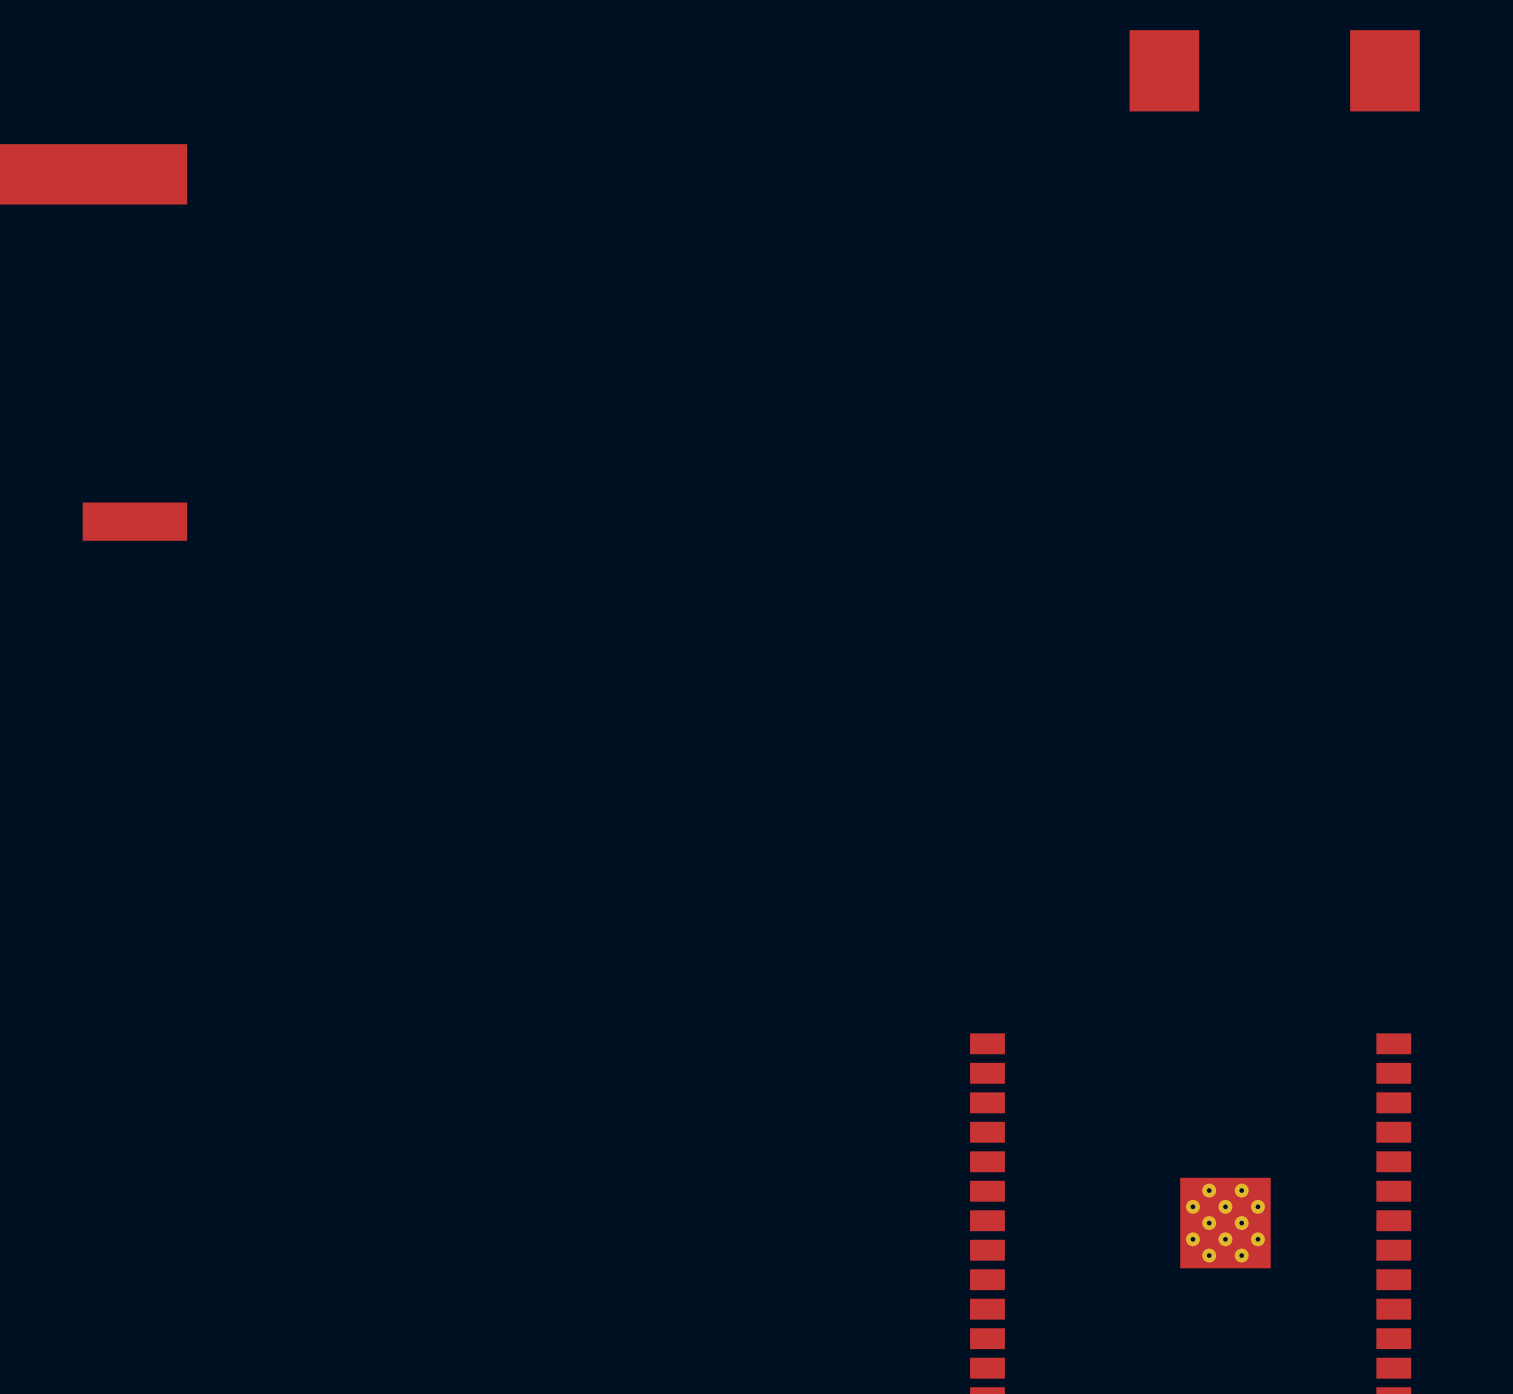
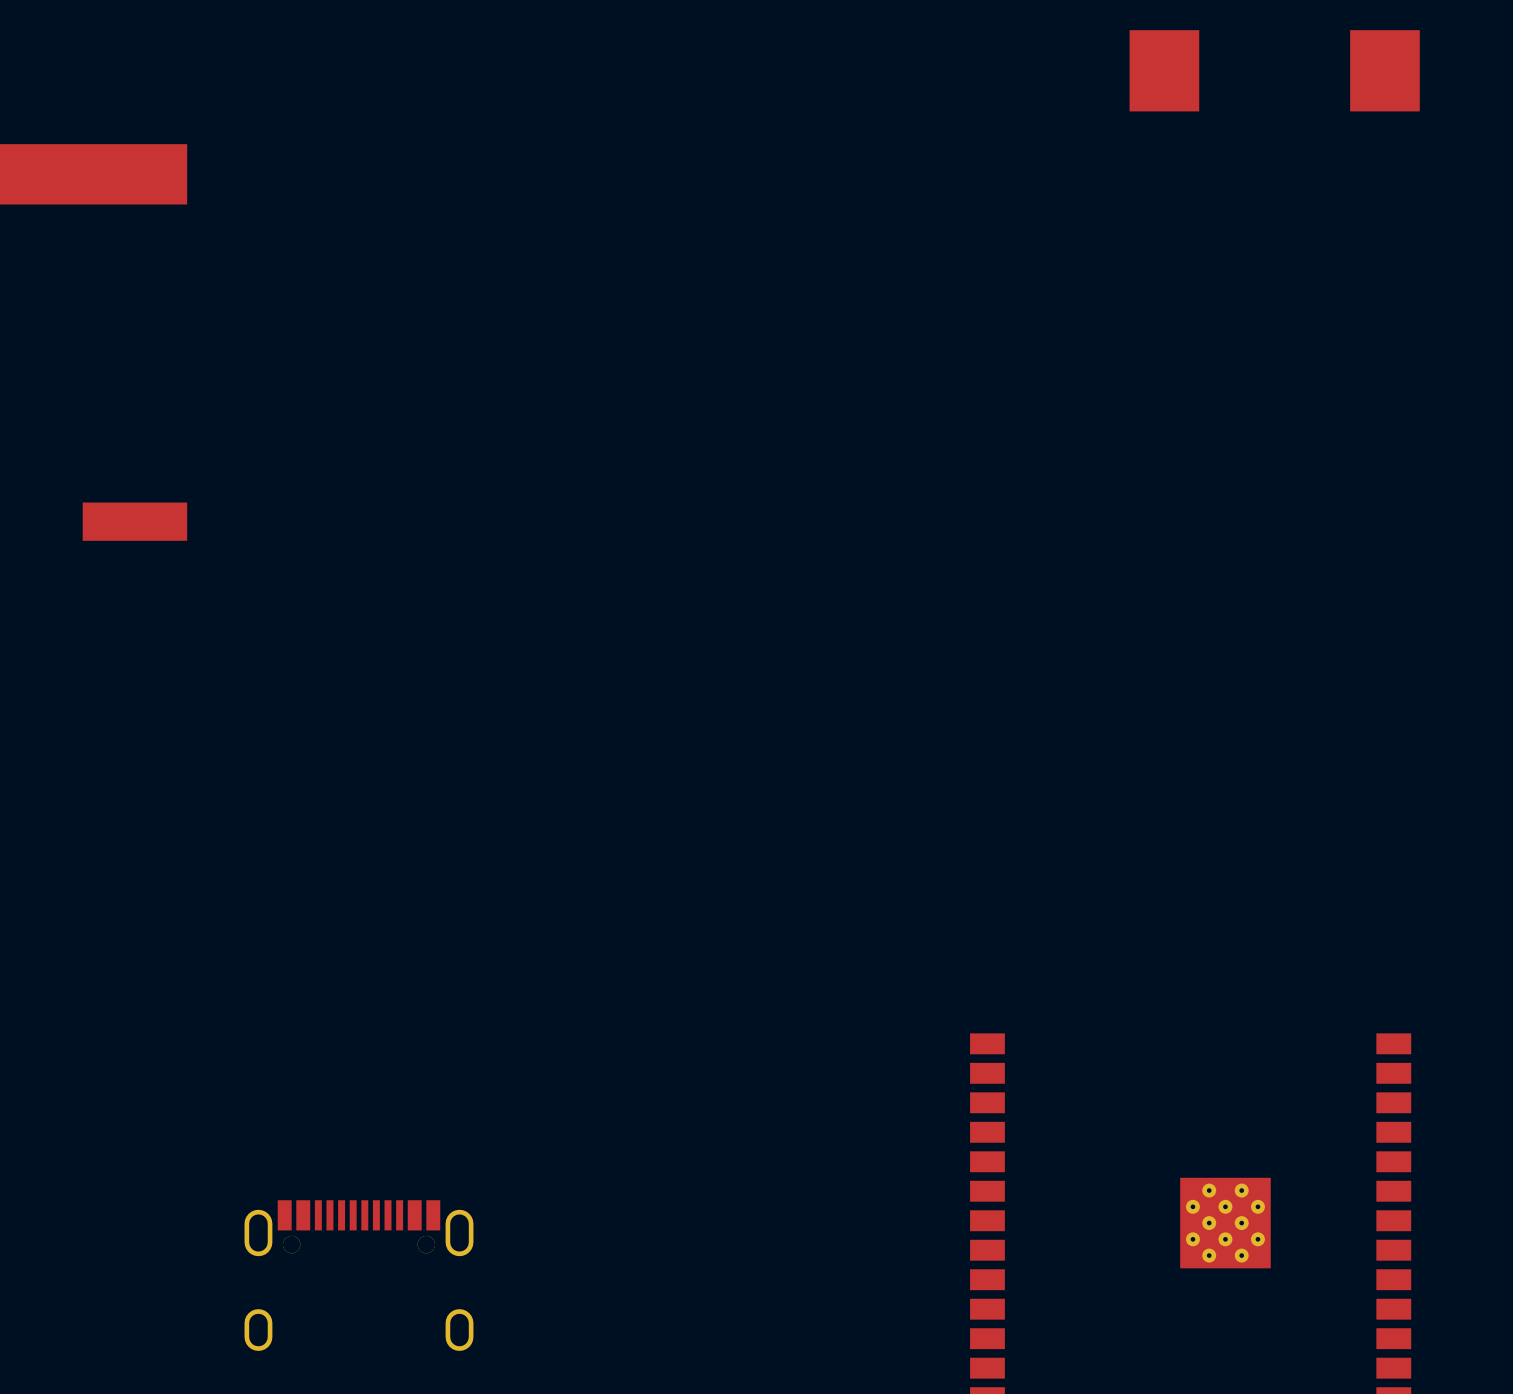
part: none -> (358, 1275)

